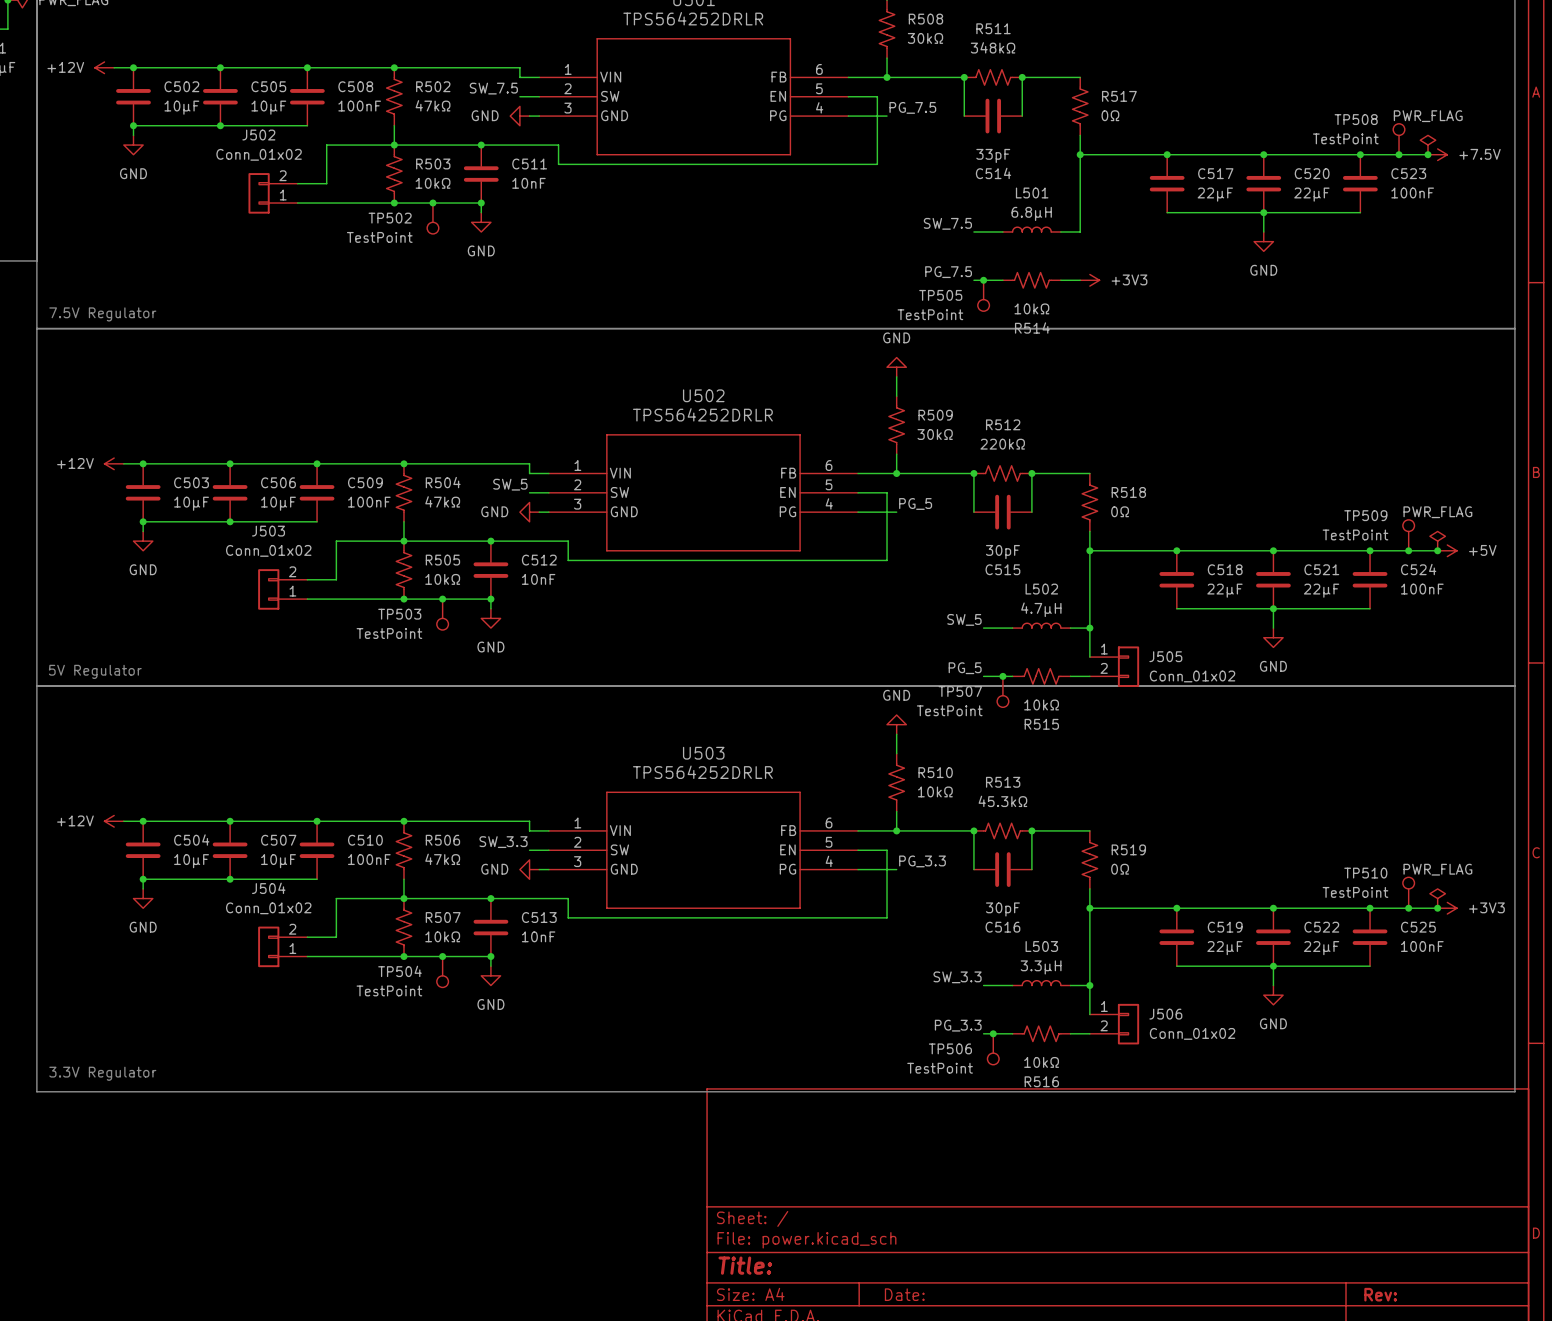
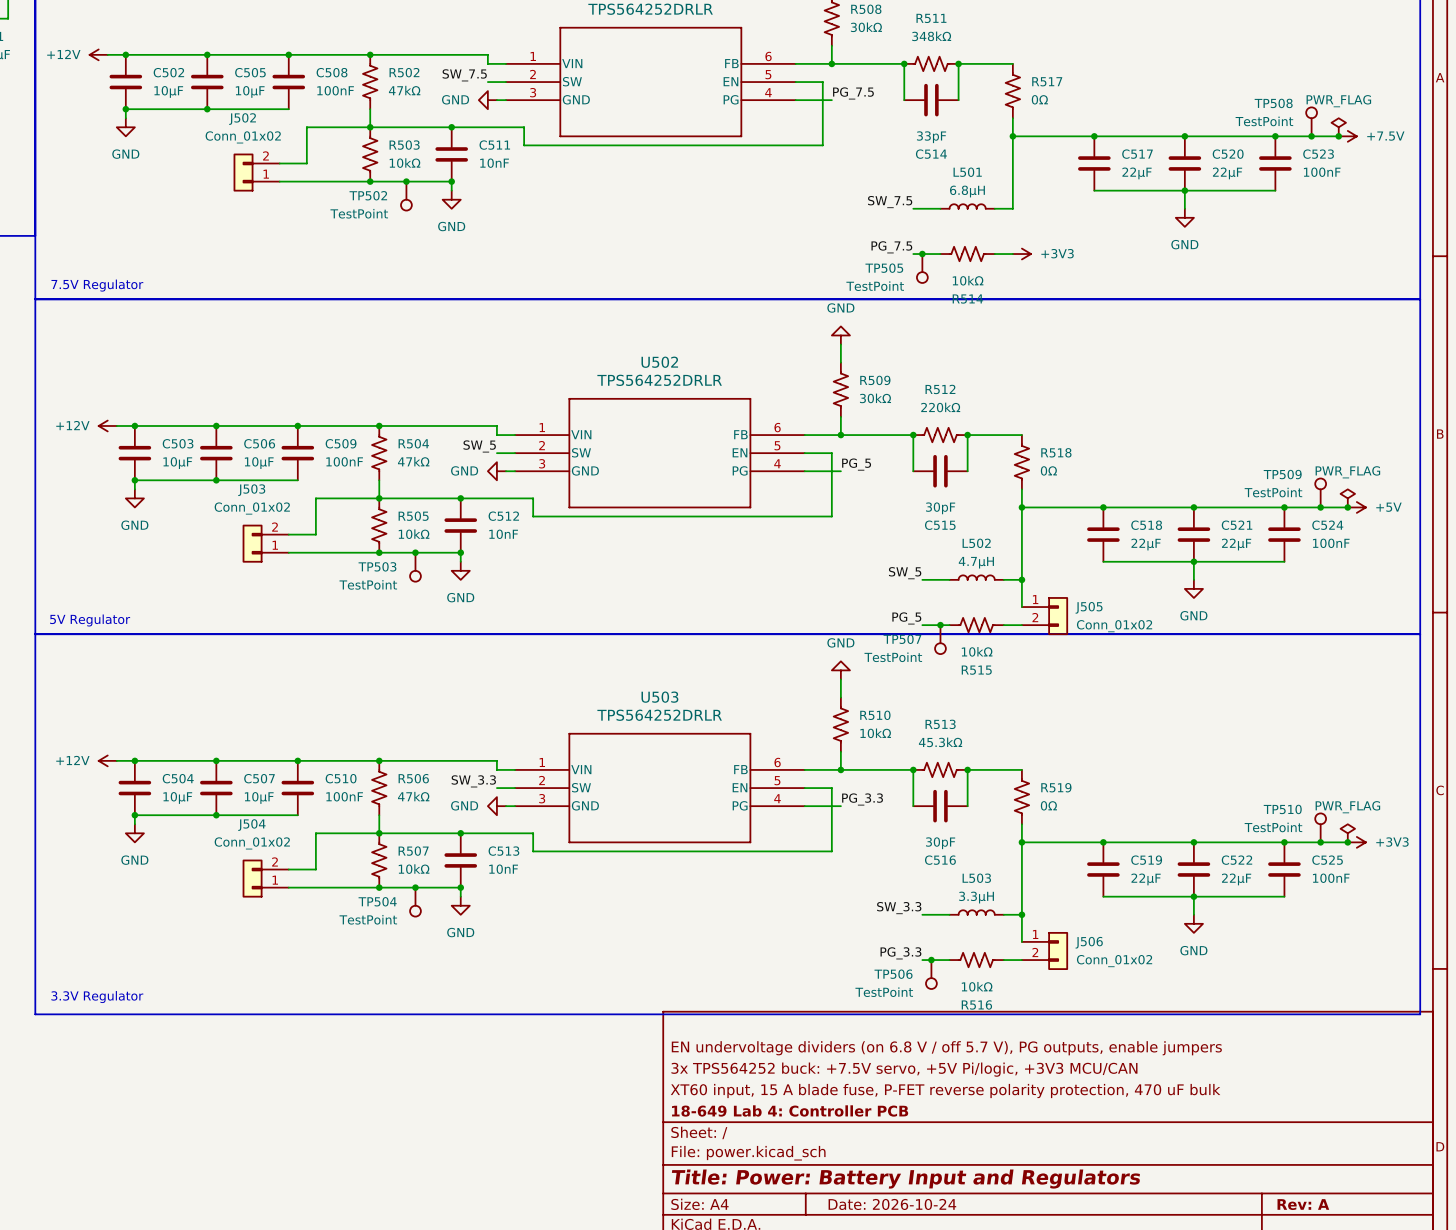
title block: none -> EN undervoltage dividers (on 6.8 V / off 5.7 V), PG outputs, enable jumpers (946, 1048)
title block: none -> 3x TPS564252 buck: +7.5V servo, +5V Pi/logic, +3V3 MCU/CAN (904, 1069)
title block: none -> XT60 input, 15 A blade fuse, P-FET reverse polarity protection, 470 uF bulk (945, 1091)
title block: none -> 18-649 Lab 4: Controller PCB (790, 1110)
title block: Title: (745, 1265) -> Title: Power: Battery Input and Regulators (905, 1179)
title block: Date: (904, 1294) -> Date: 2026-10-24 (892, 1204)
title block: Rev: (1380, 1294) -> Rev: A (1303, 1204)

